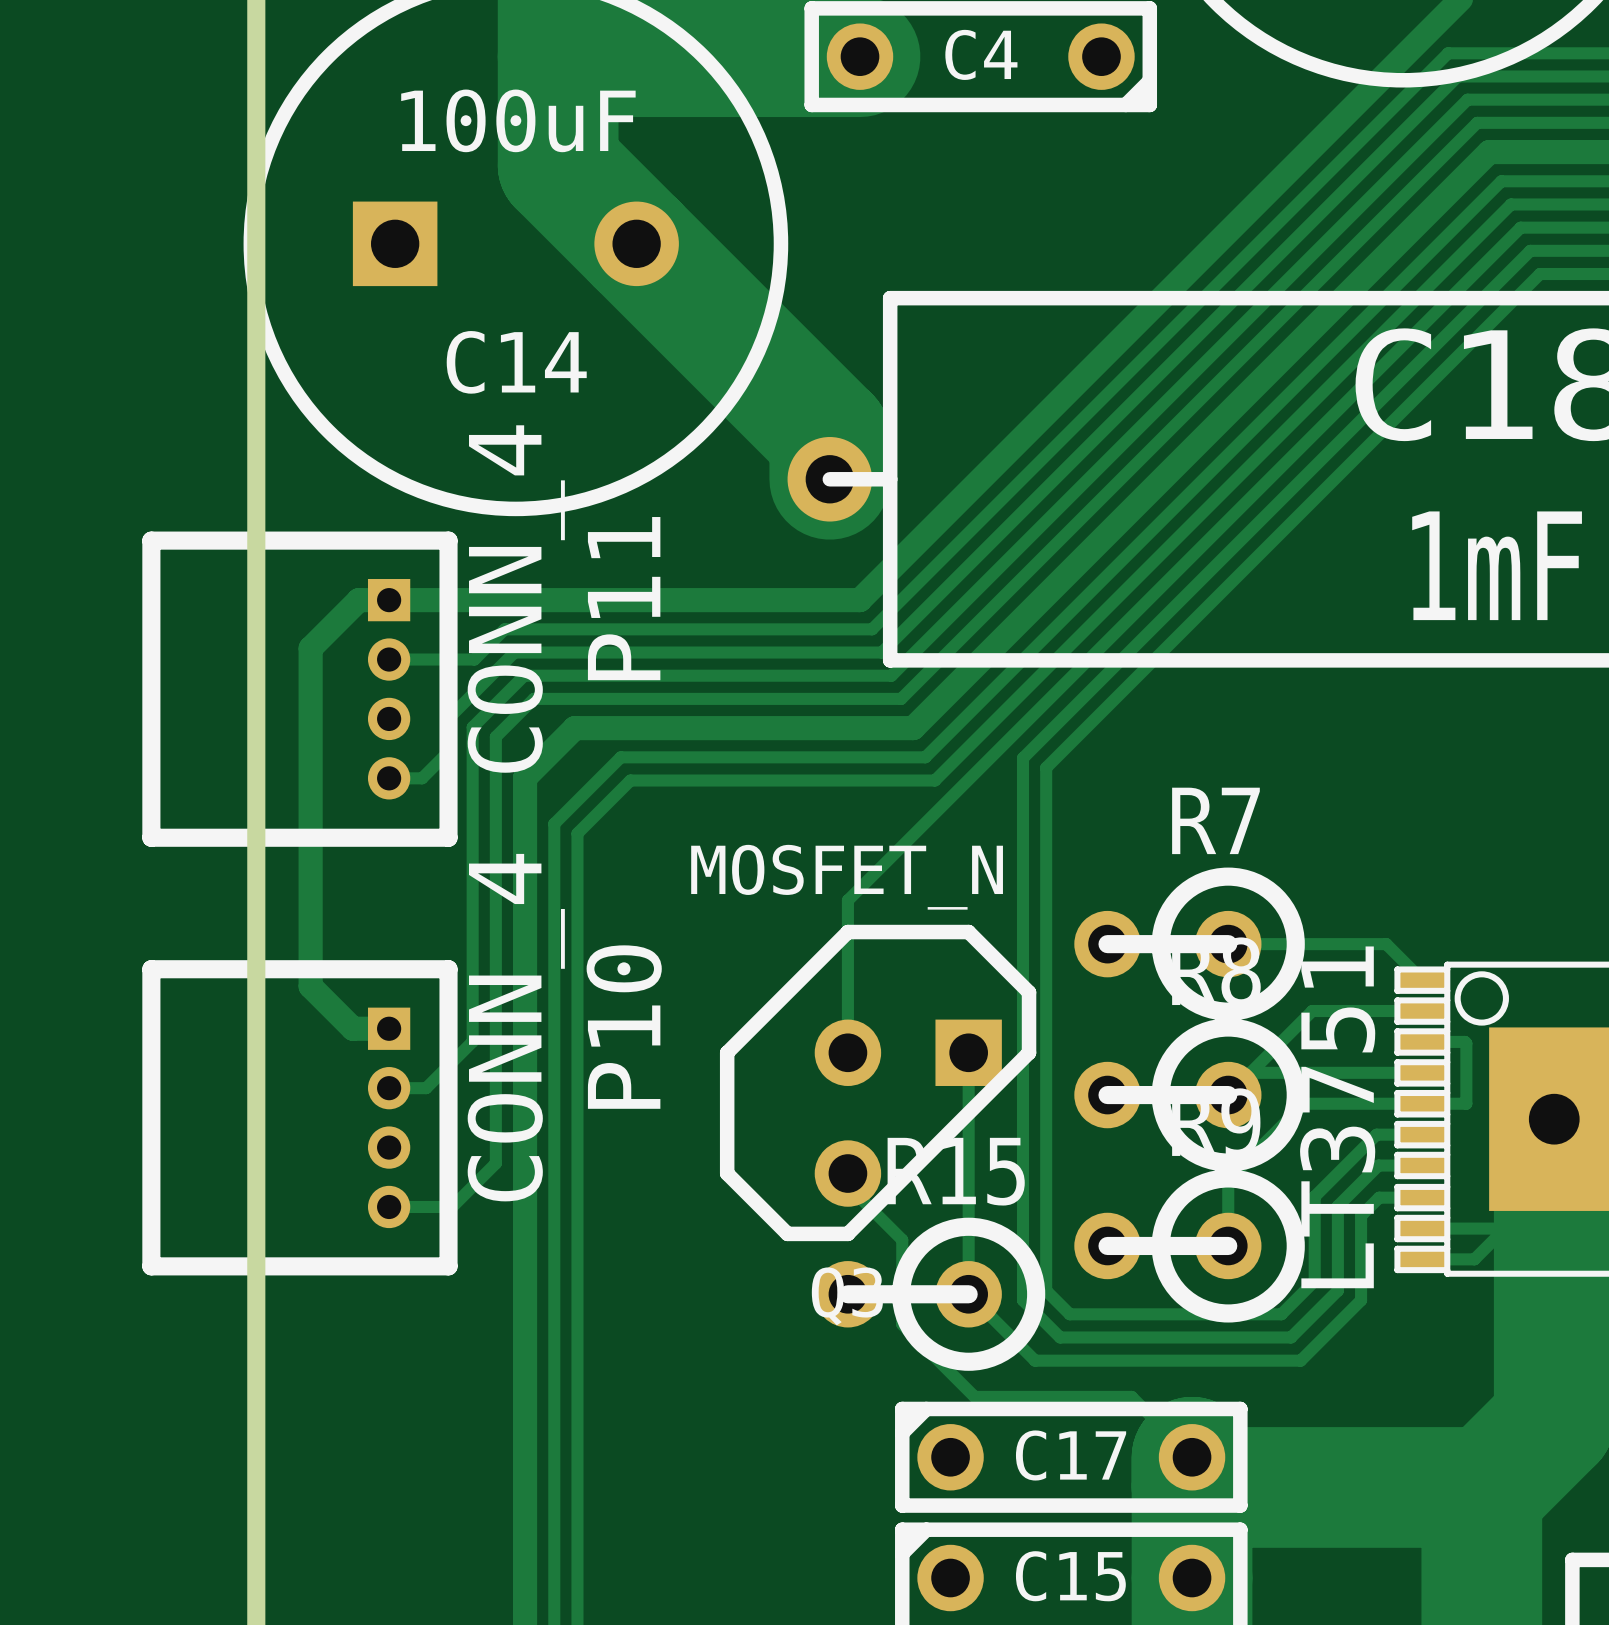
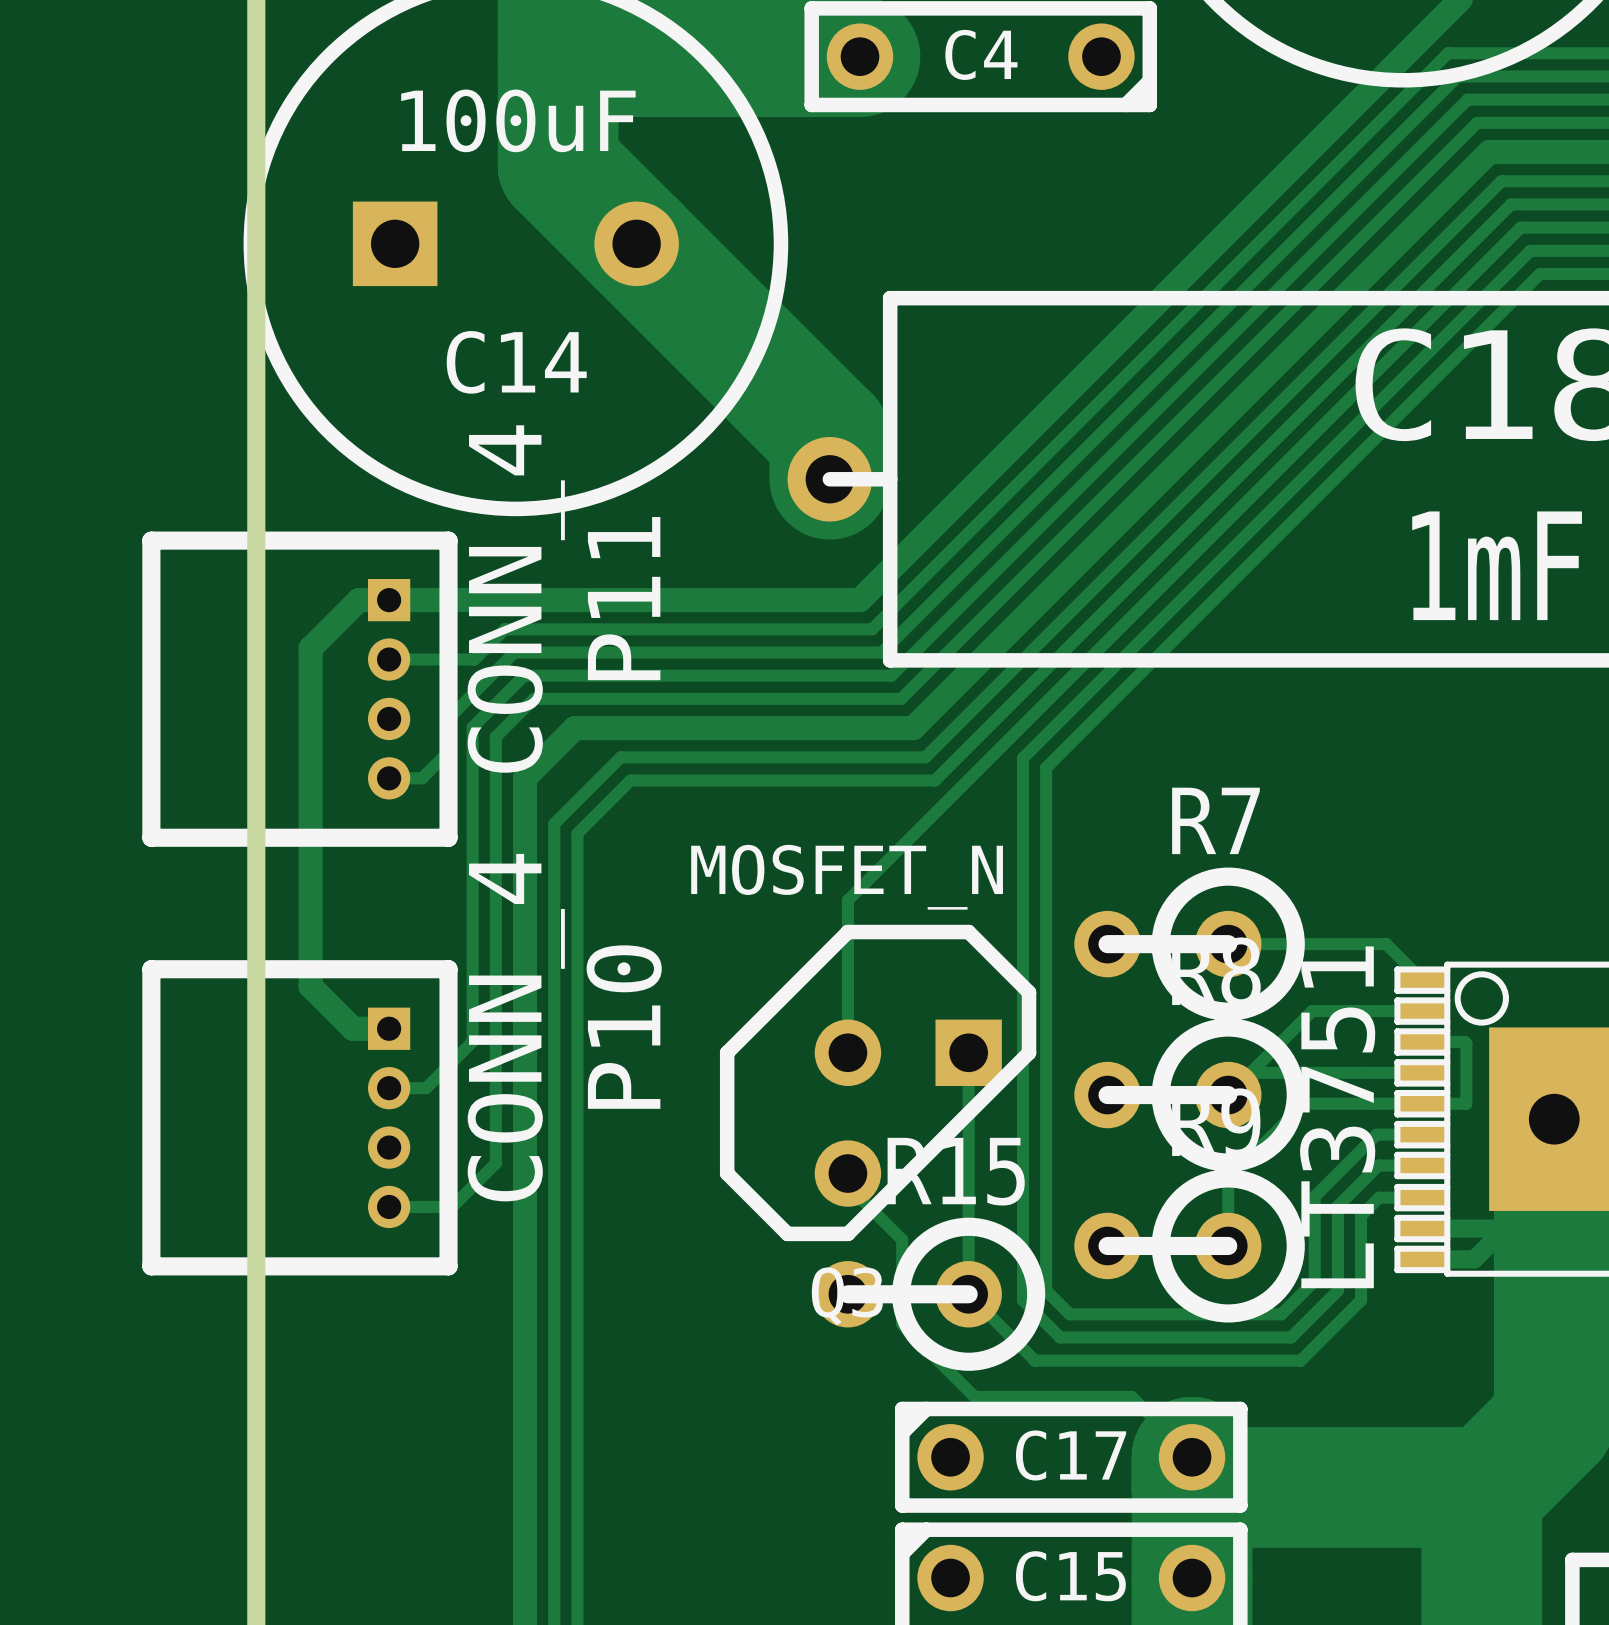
track width: thin (1422, 1228) (1505, 1228) (1474, 1259) (1422, 1259) -> thick (1422, 1228) (1505, 1228) (1474, 1259) (1422, 1259)

